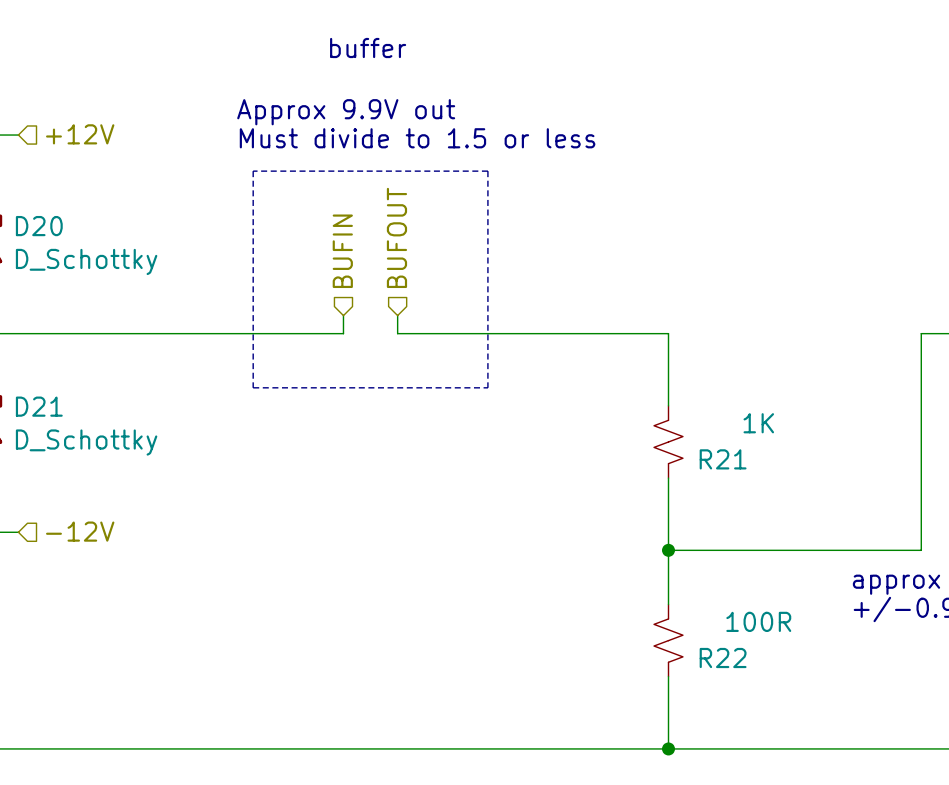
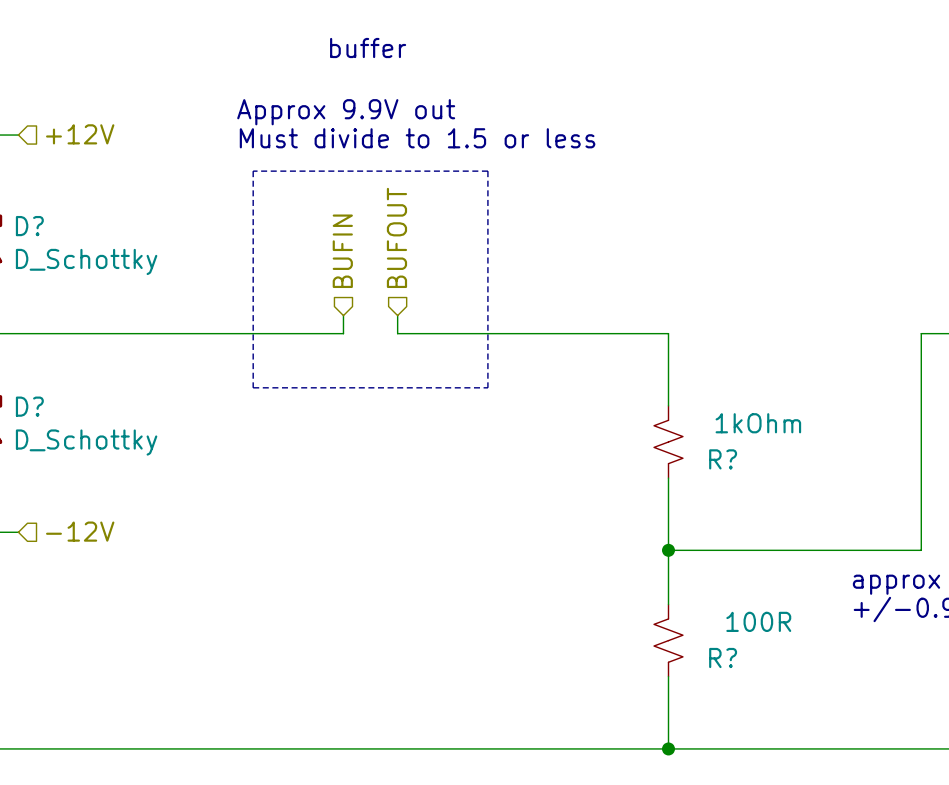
D20 name: D20 (39, 226) -> D? (29, 226)
D21 name: D21 (39, 406) -> D? (29, 406)
R21 value: 1K (758, 423) -> 1kOhm (758, 423)
R21 name: R21 (723, 459) -> R? (723, 459)
R22 name: R22 (723, 658) -> R? (723, 658)

